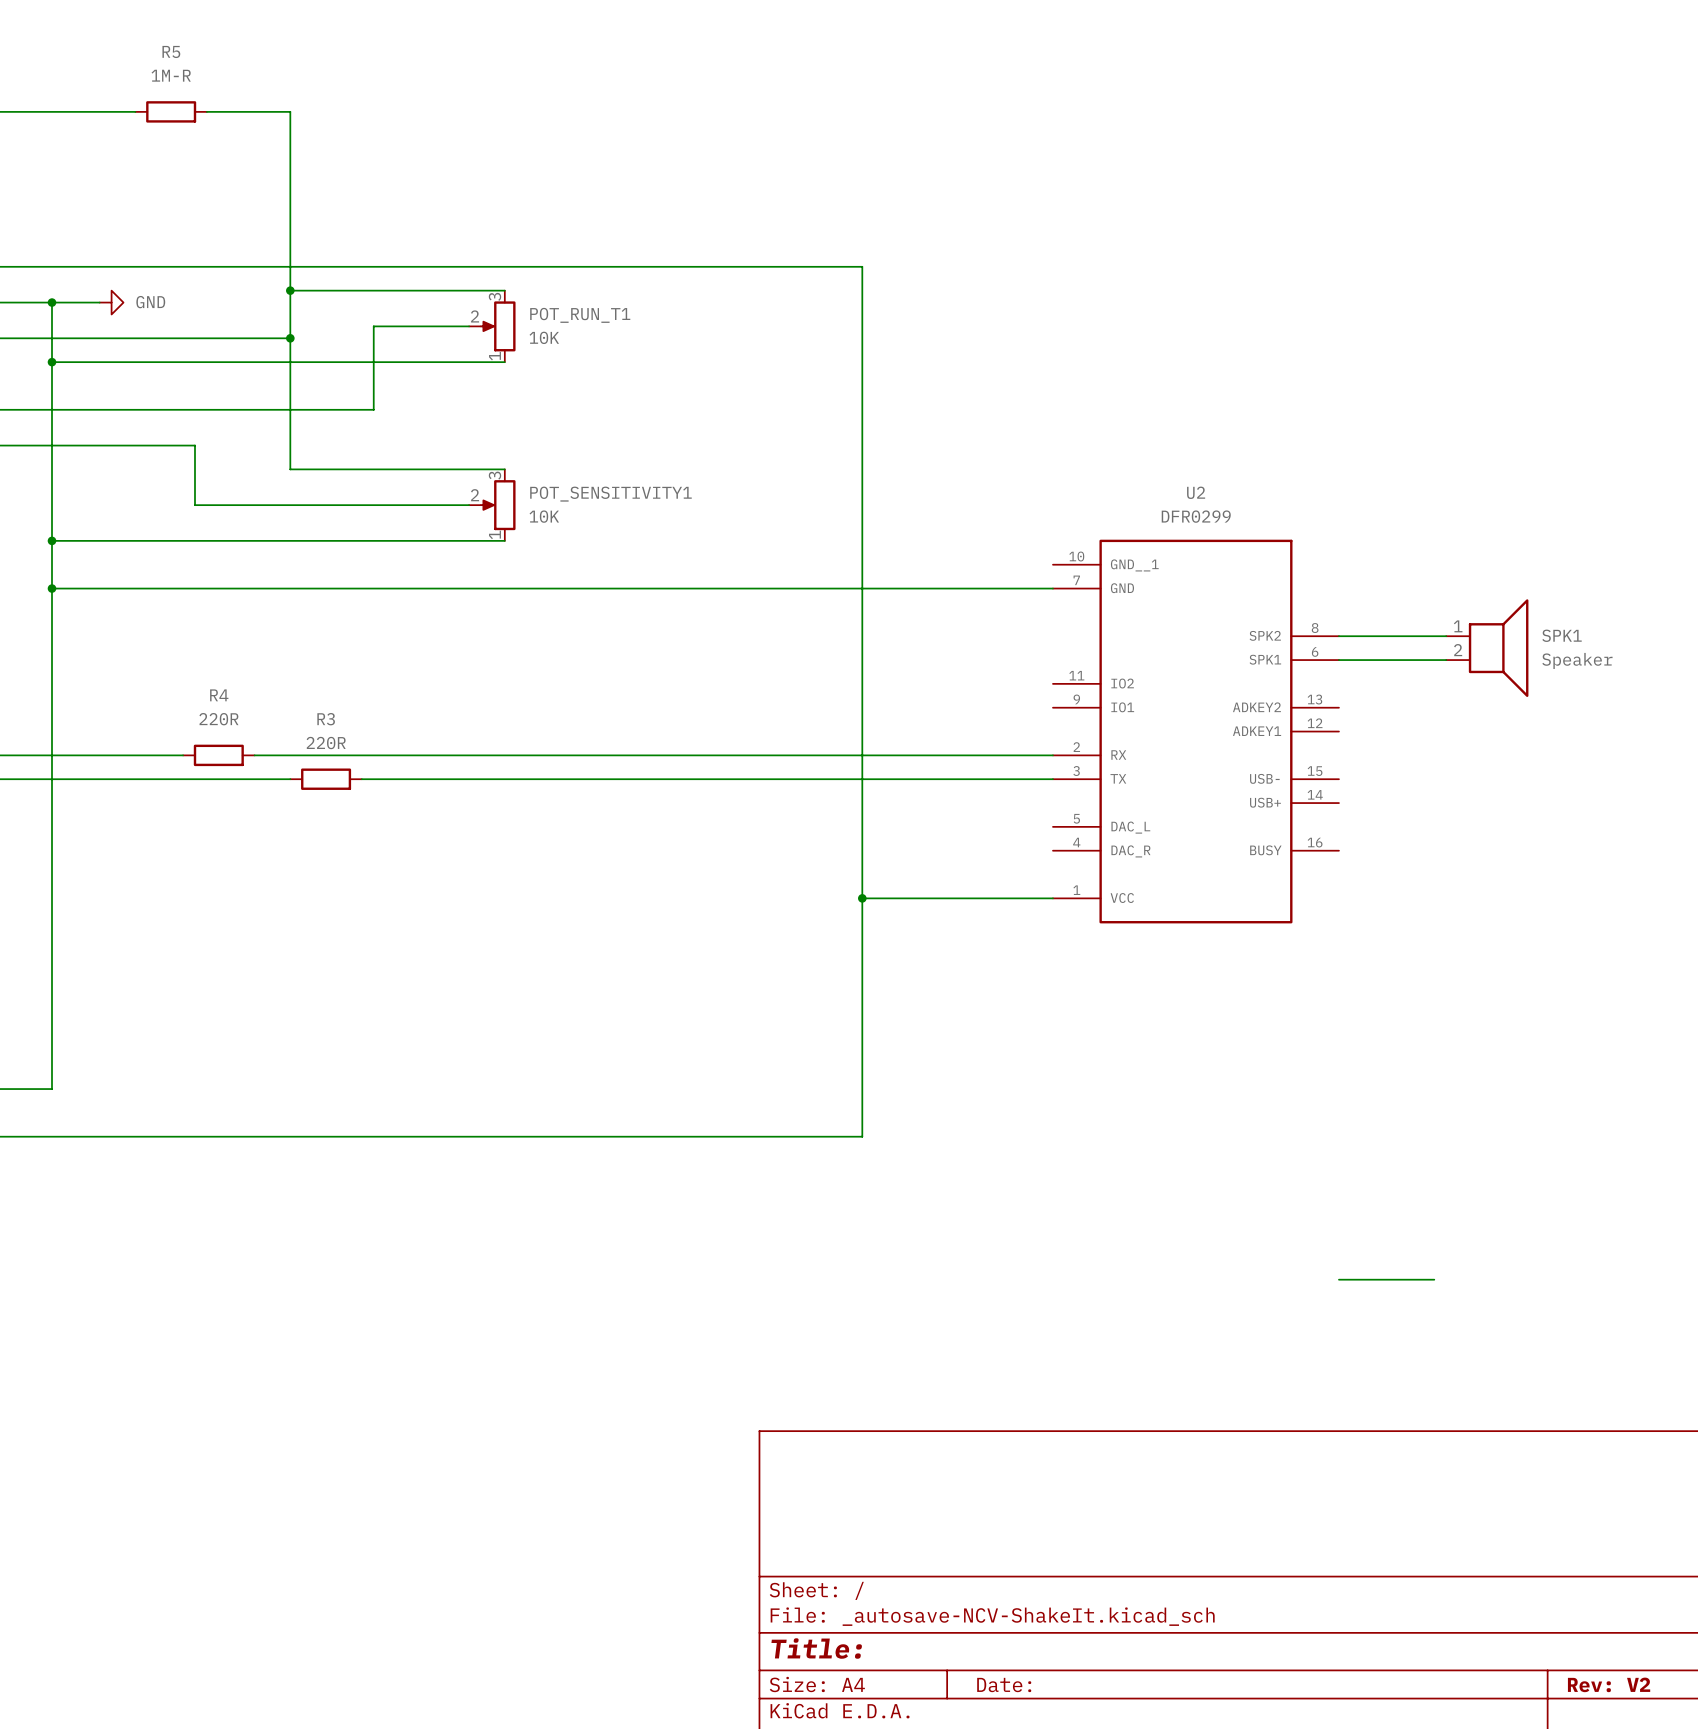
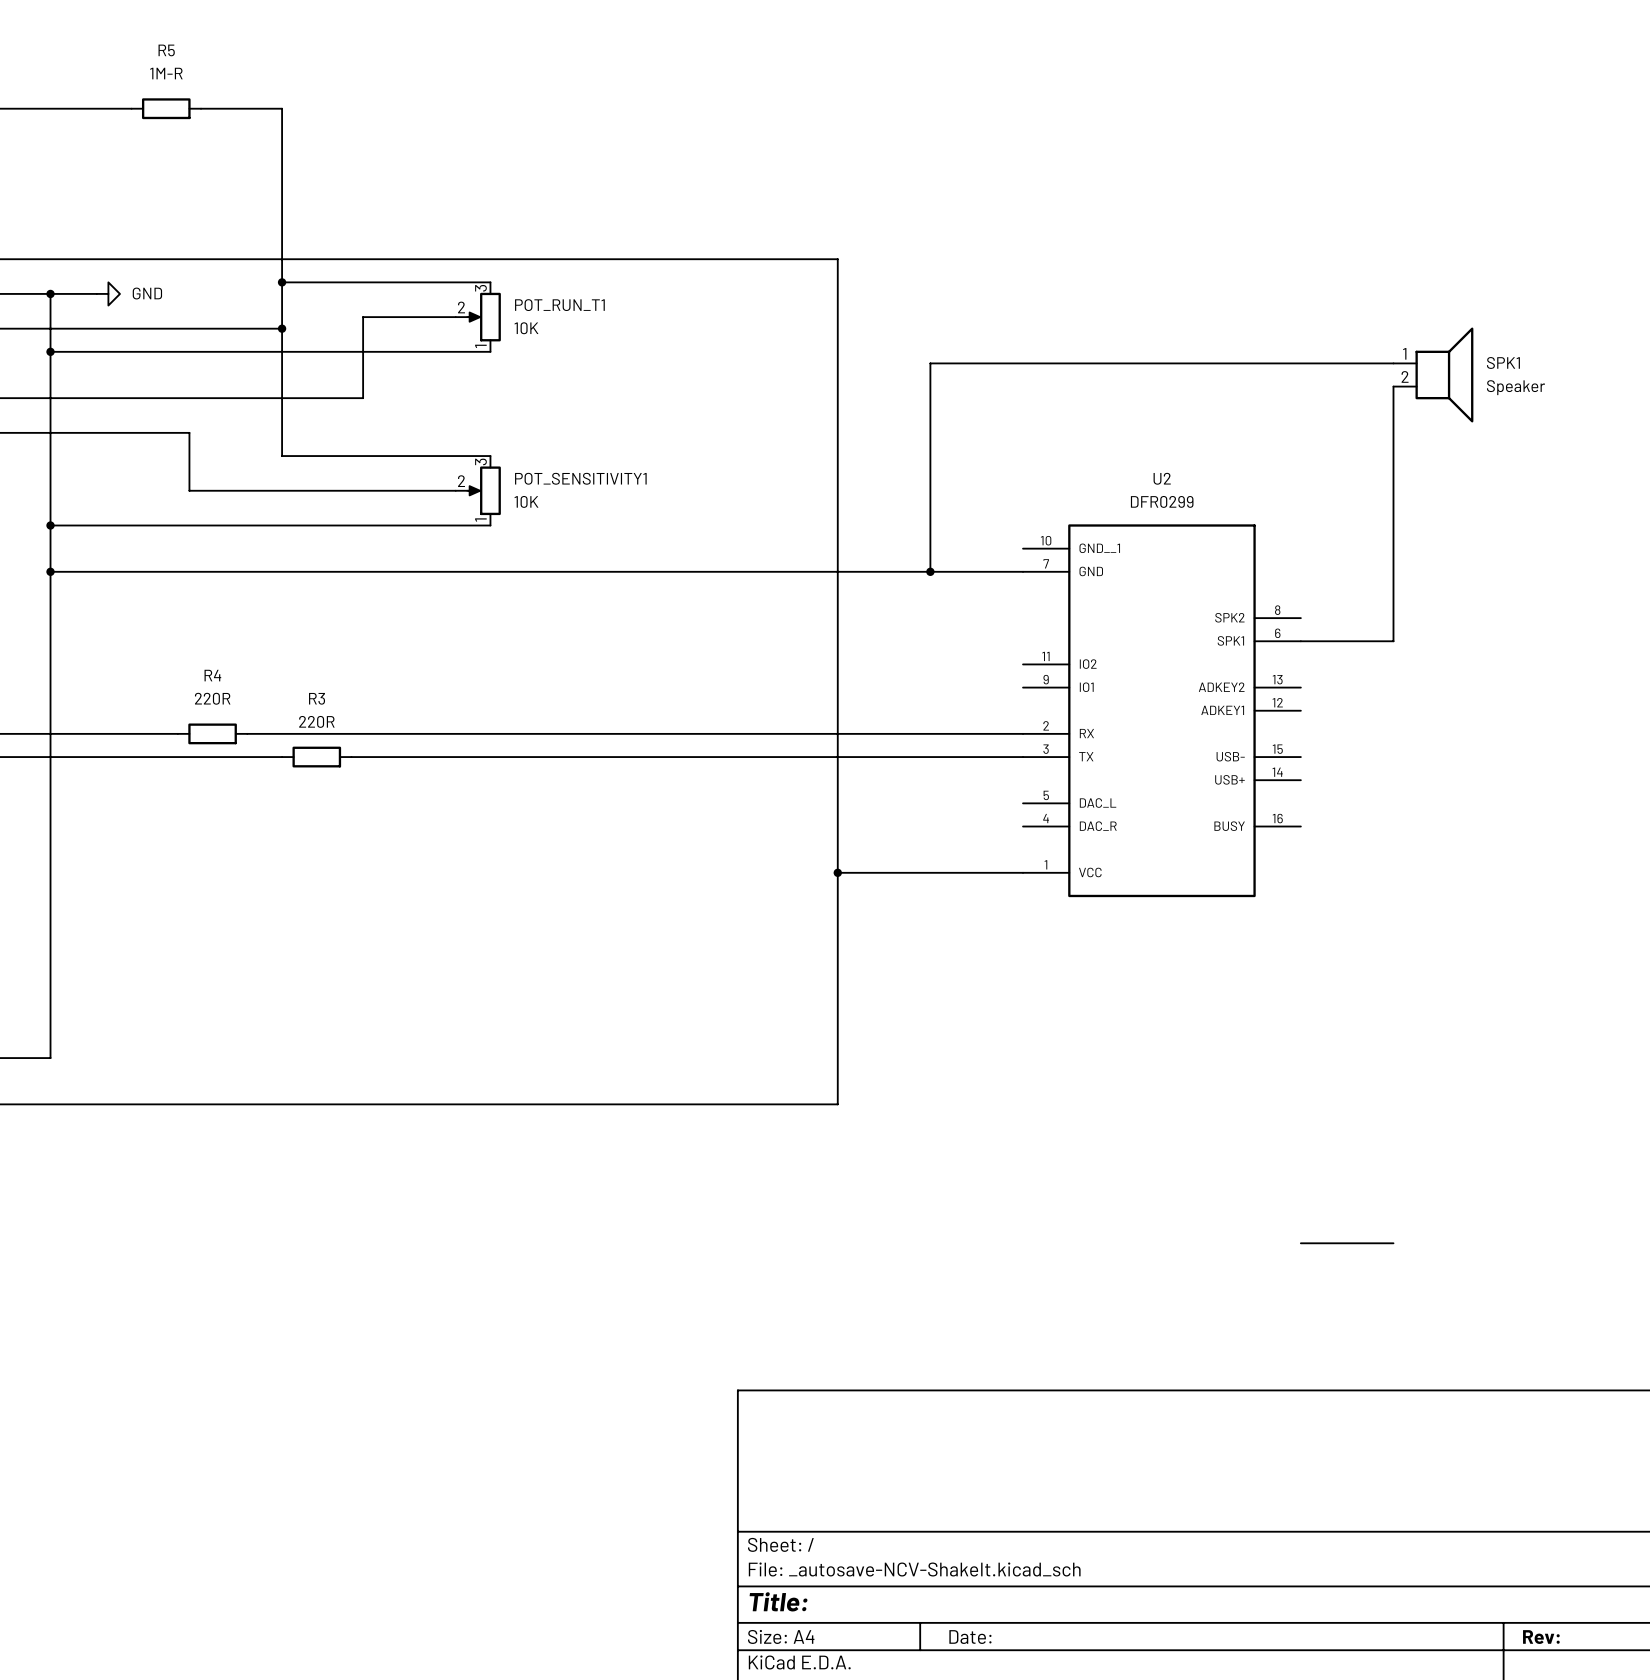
wire: none -> (1393, 363) (930, 363) (930, 571)
junction: none -> (930, 571)
wire: (1338, 636) (1446, 636) -> none
SPK1 position: (1487, 648) -> (1433, 374)
wire: (1434, 660) (1446, 660) -> (1393, 641) (1393, 386)
title block: Rev: V2 (1609, 1684) -> Rev: (1541, 1637)

